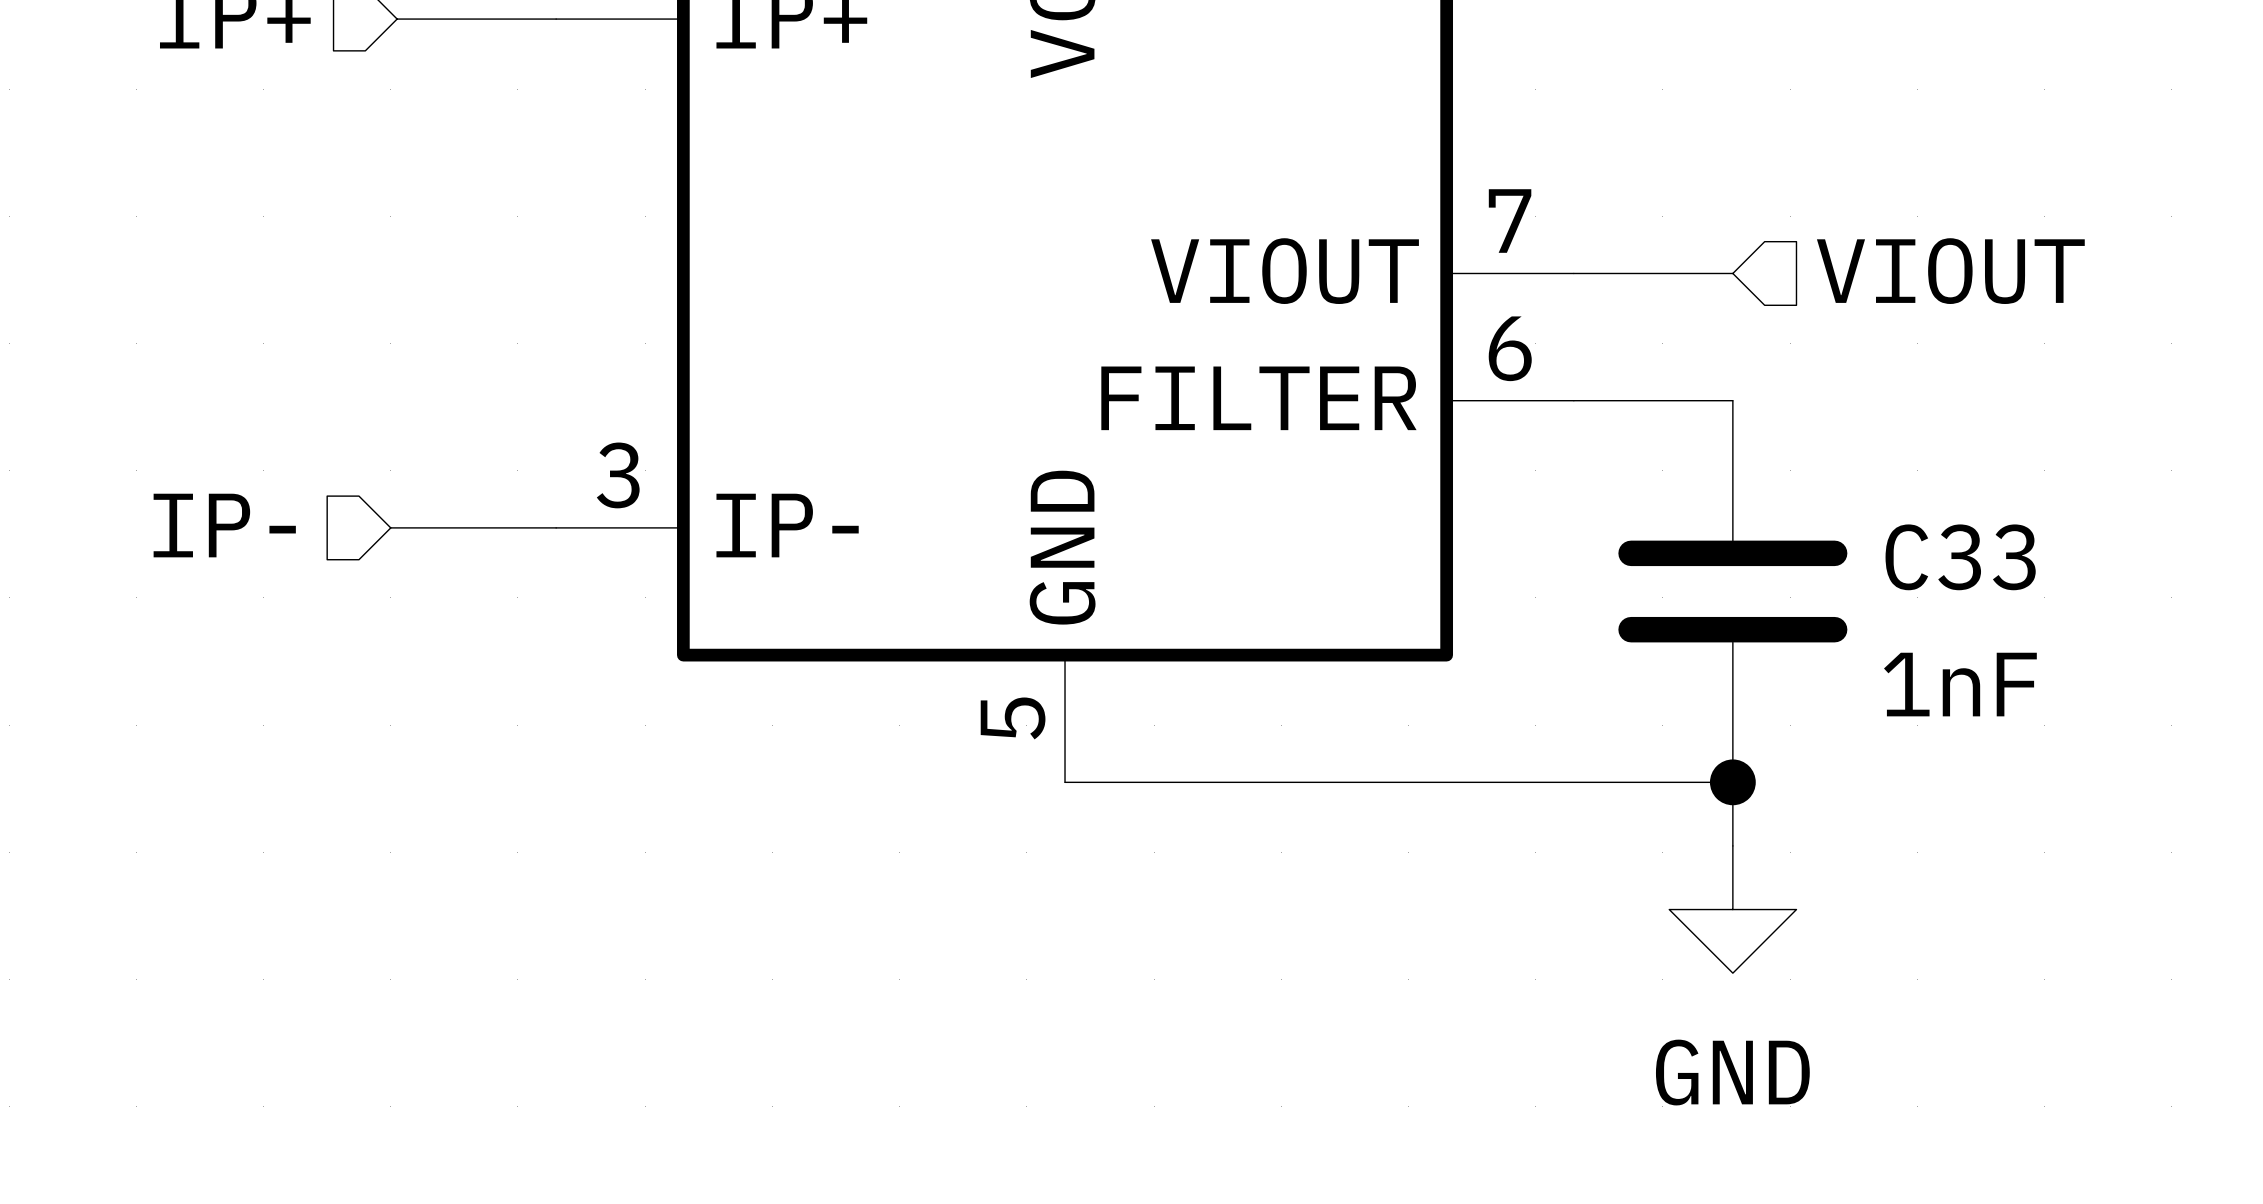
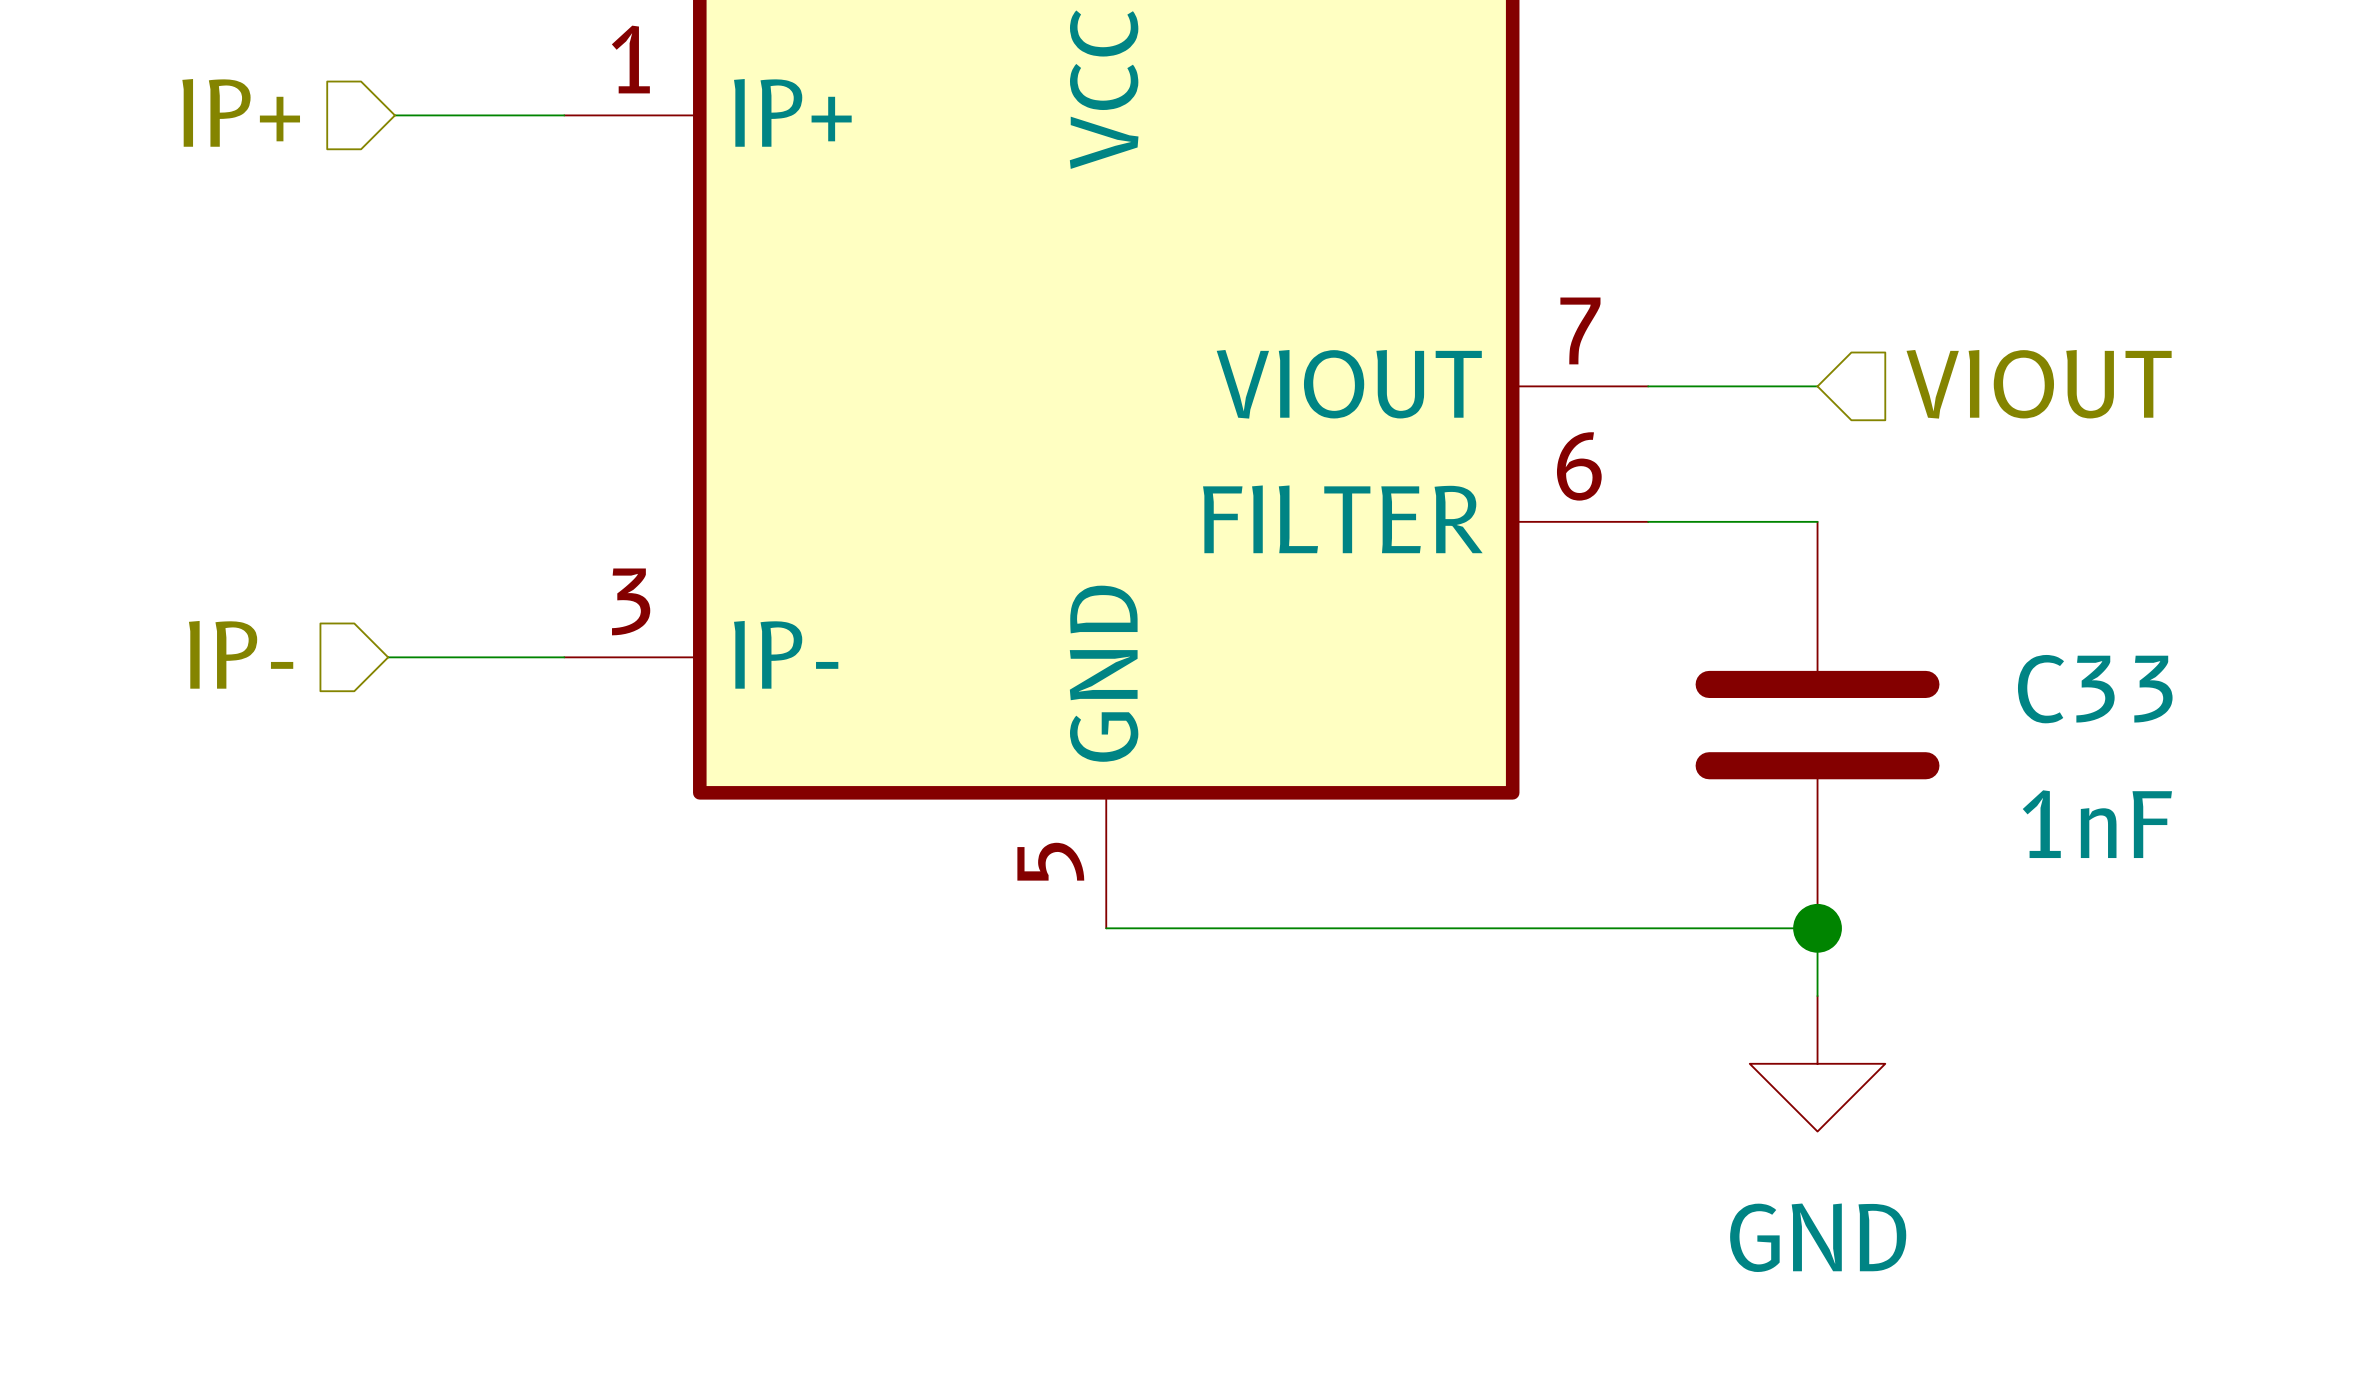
C33 name position: C33 (1960, 557) -> C33 (2095, 689)
C33 value position: 1nF (1960, 684) -> 1nF (2097, 824)

